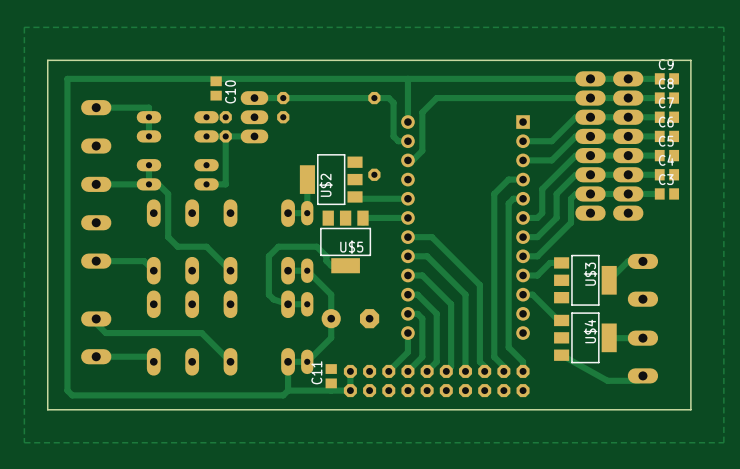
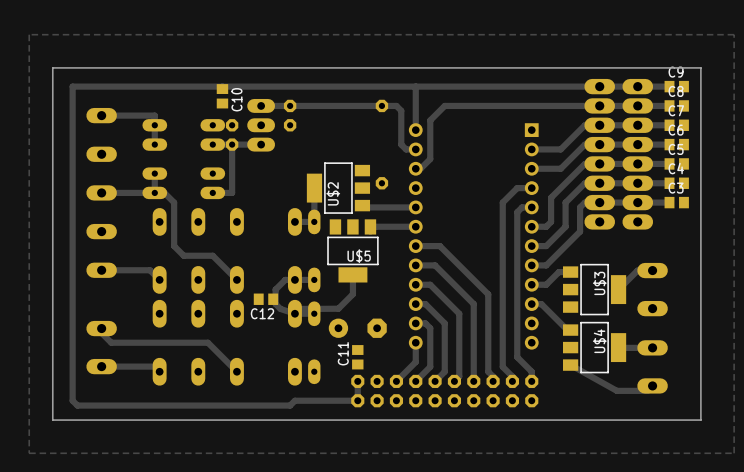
track: (345, 265) (331, 265) (326, 260) (326, 256) (316, 246) (278, 246) (268, 256) (268, 280) -> (352, 274) (352, 294) (338, 308) (294, 308)
track: none -> (294, 279) (285, 279) (275, 289)
track: (307, 270) (331, 294) (331, 337) (307, 361) (288, 361) (288, 390) -> none
C12: none -> (265, 299)
C11 position: (331, 376) -> (357, 357)

